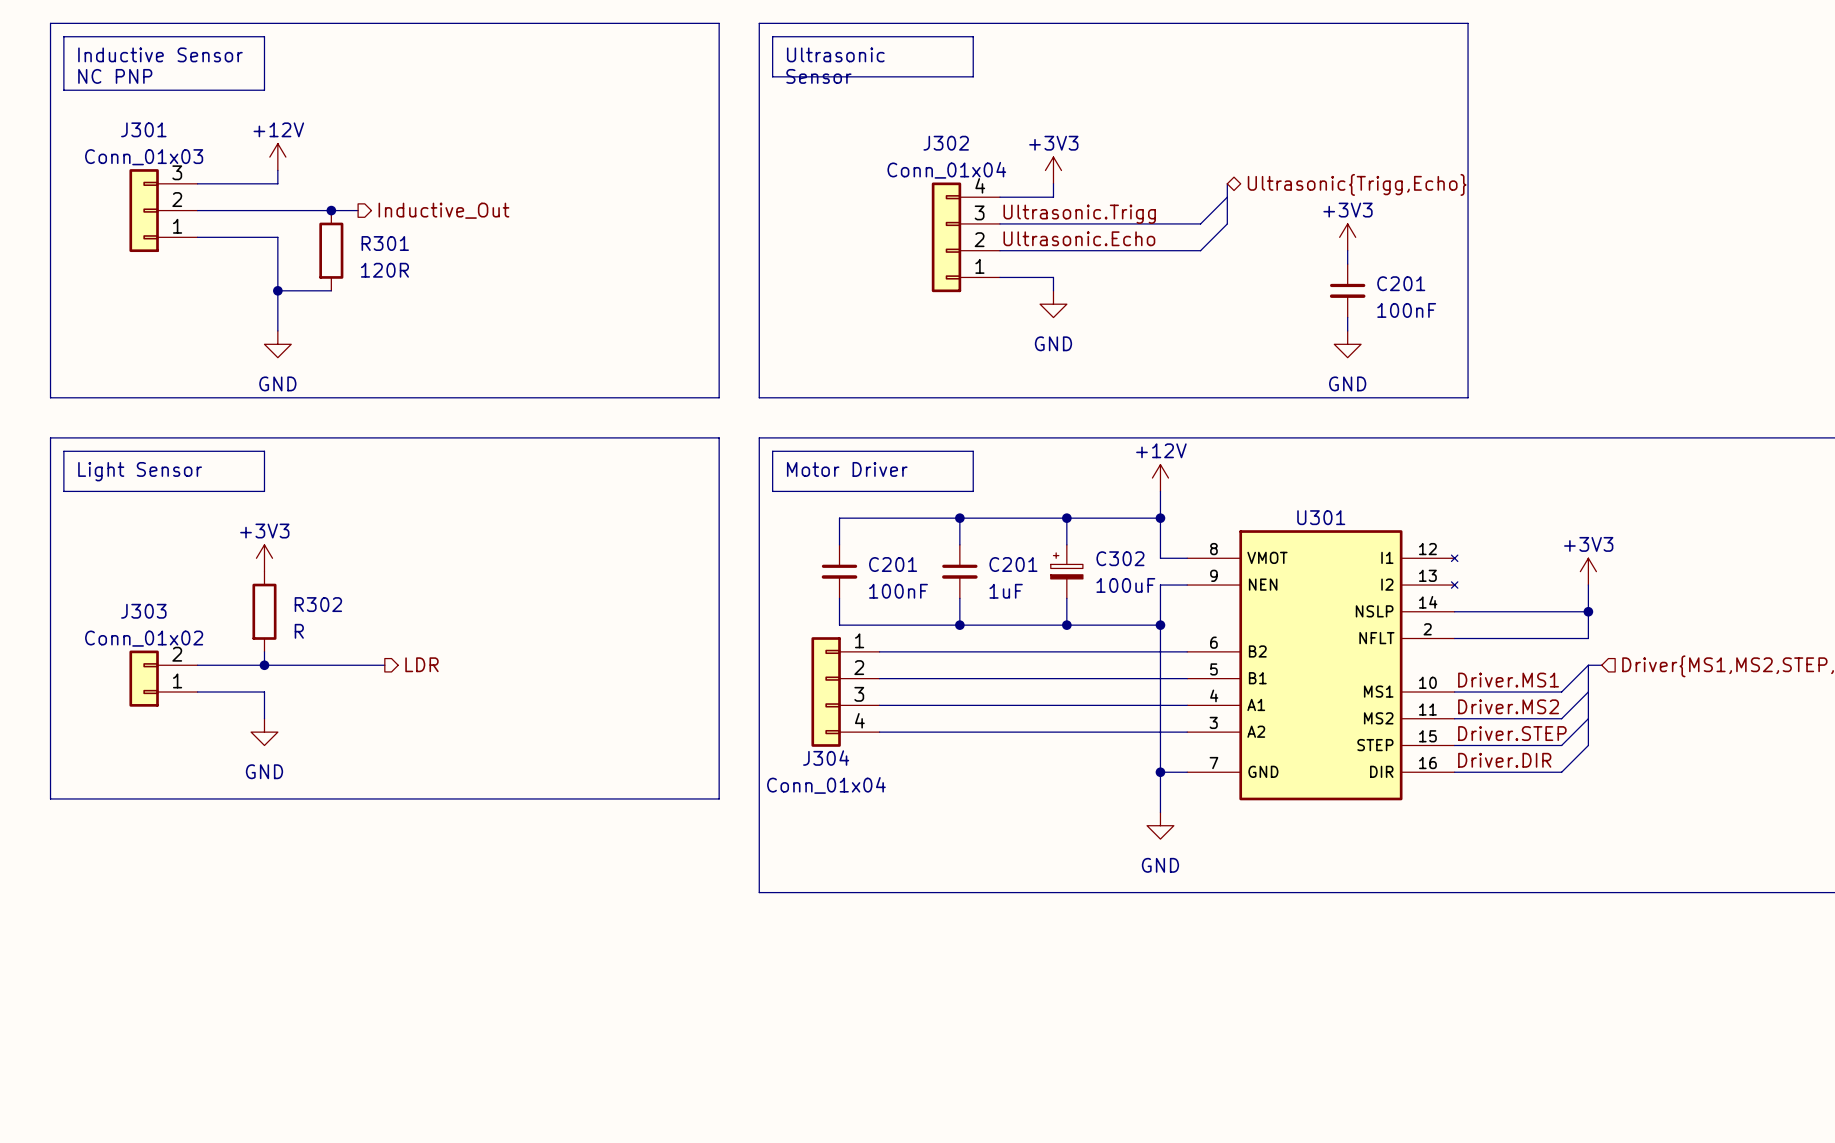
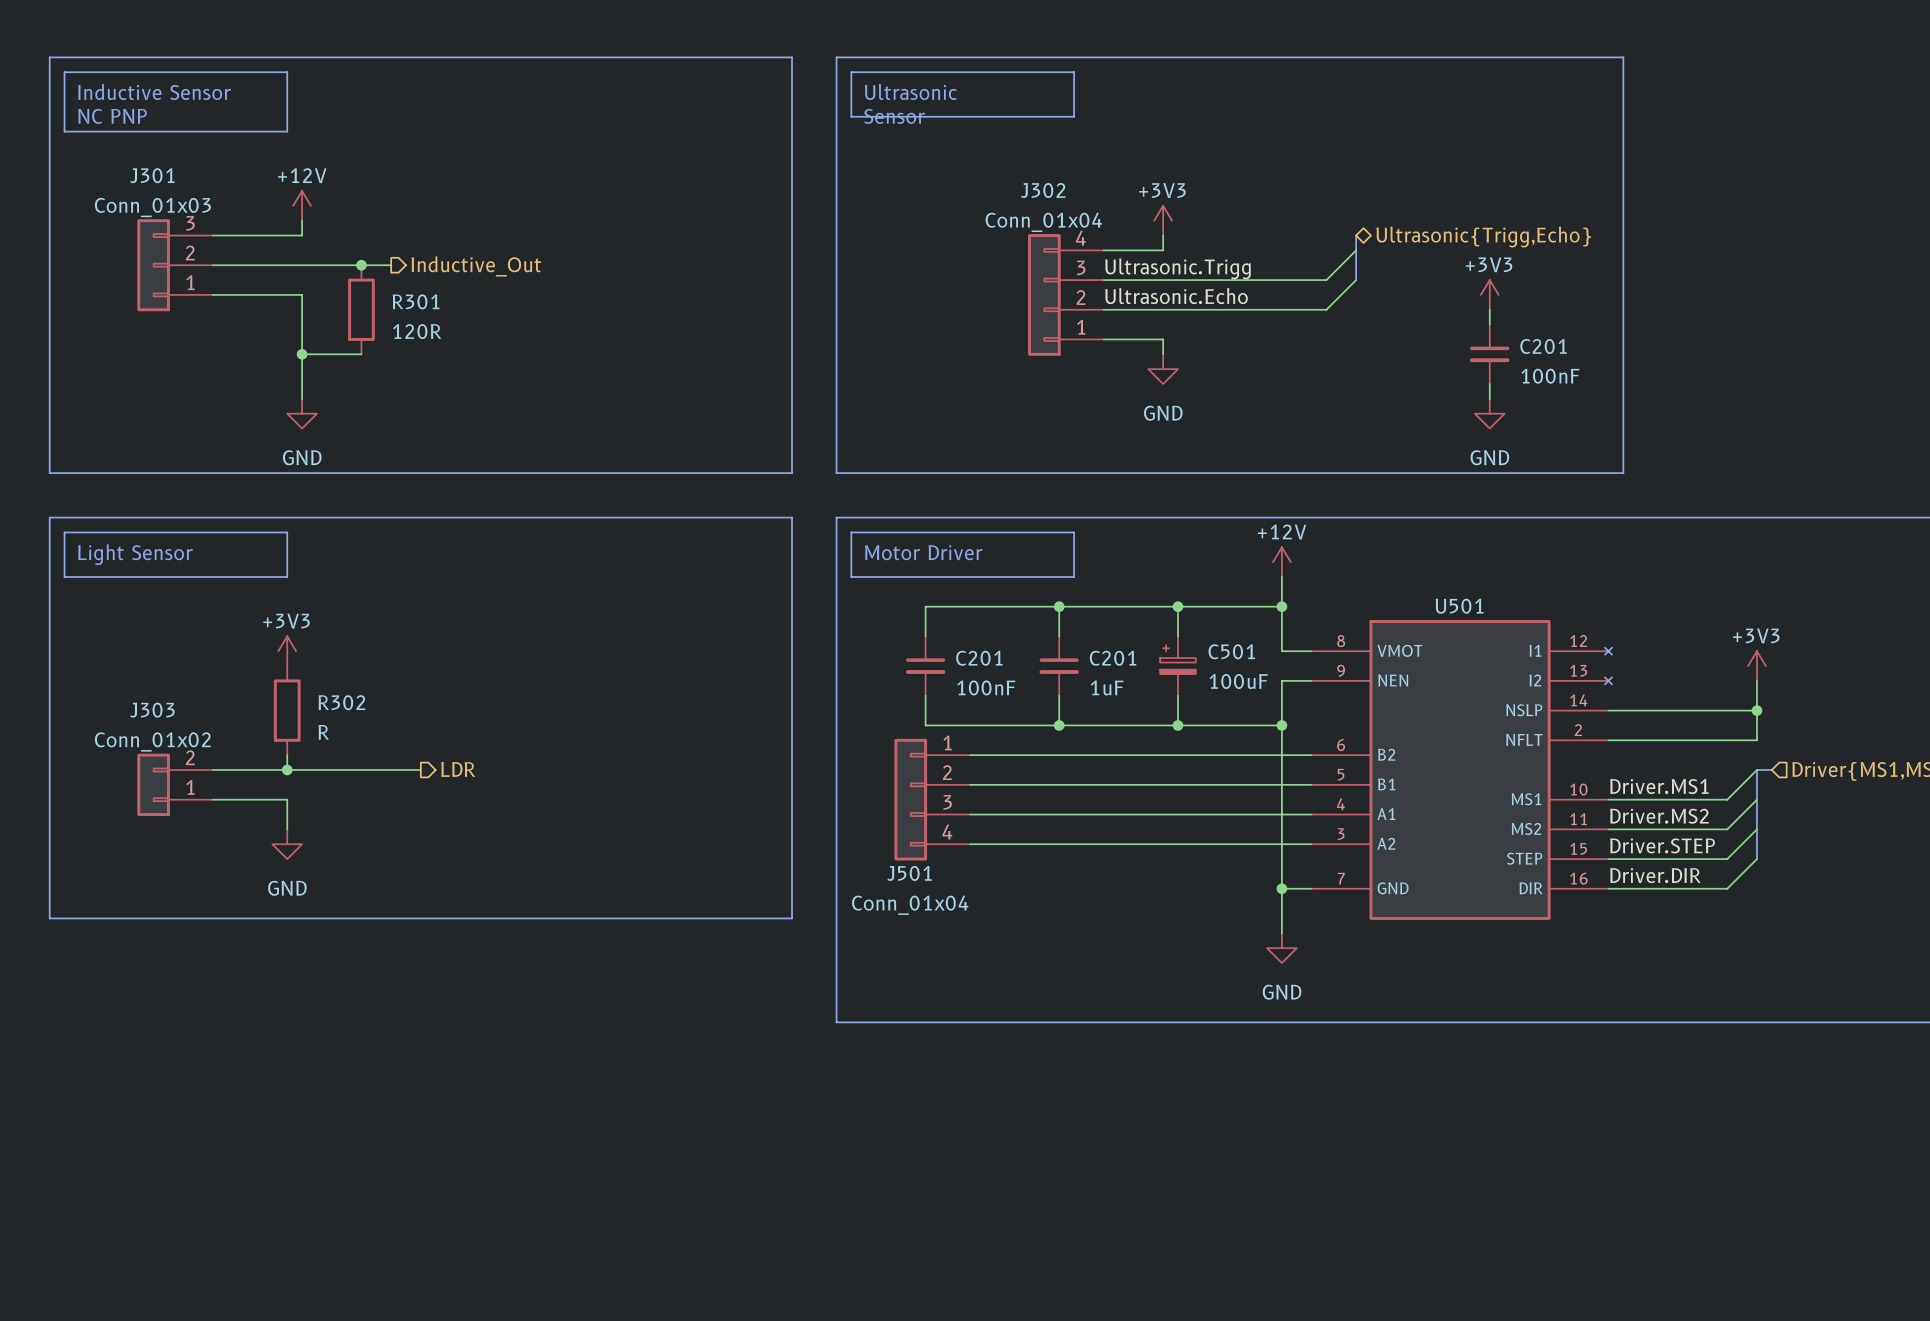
U301 name: U301 (1321, 517) -> U501 (1459, 606)
C302 name: C302 (1120, 558) -> C501 (1231, 651)
J304 name: J304 (826, 758) -> J501 (909, 873)

